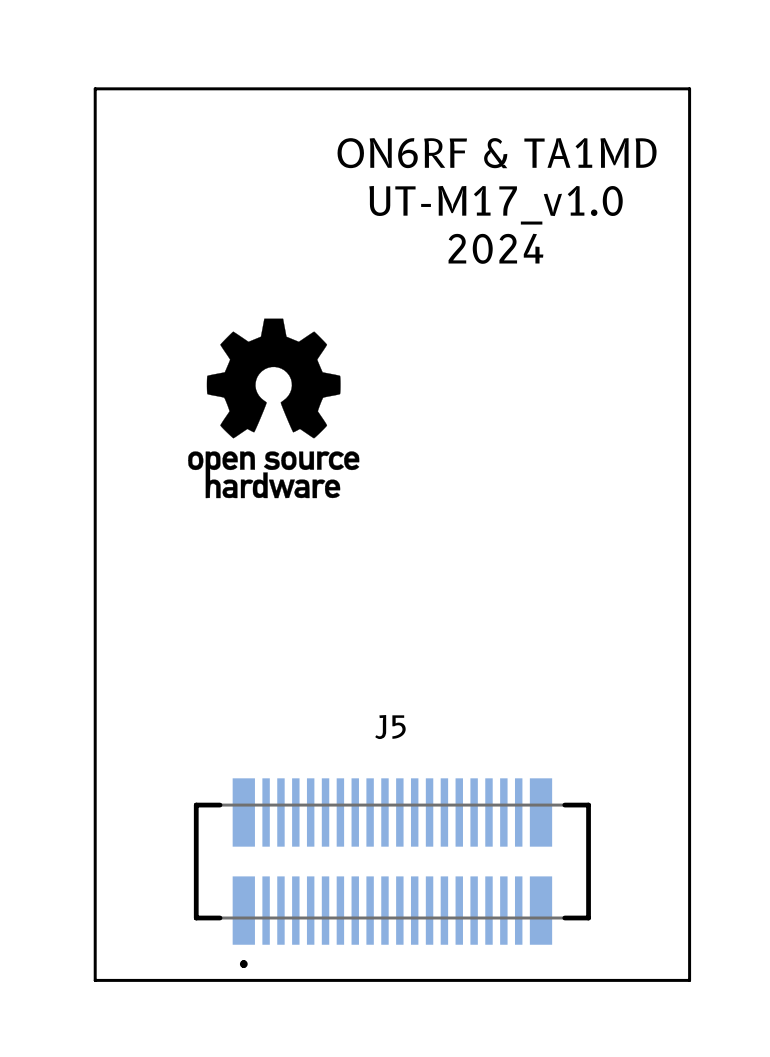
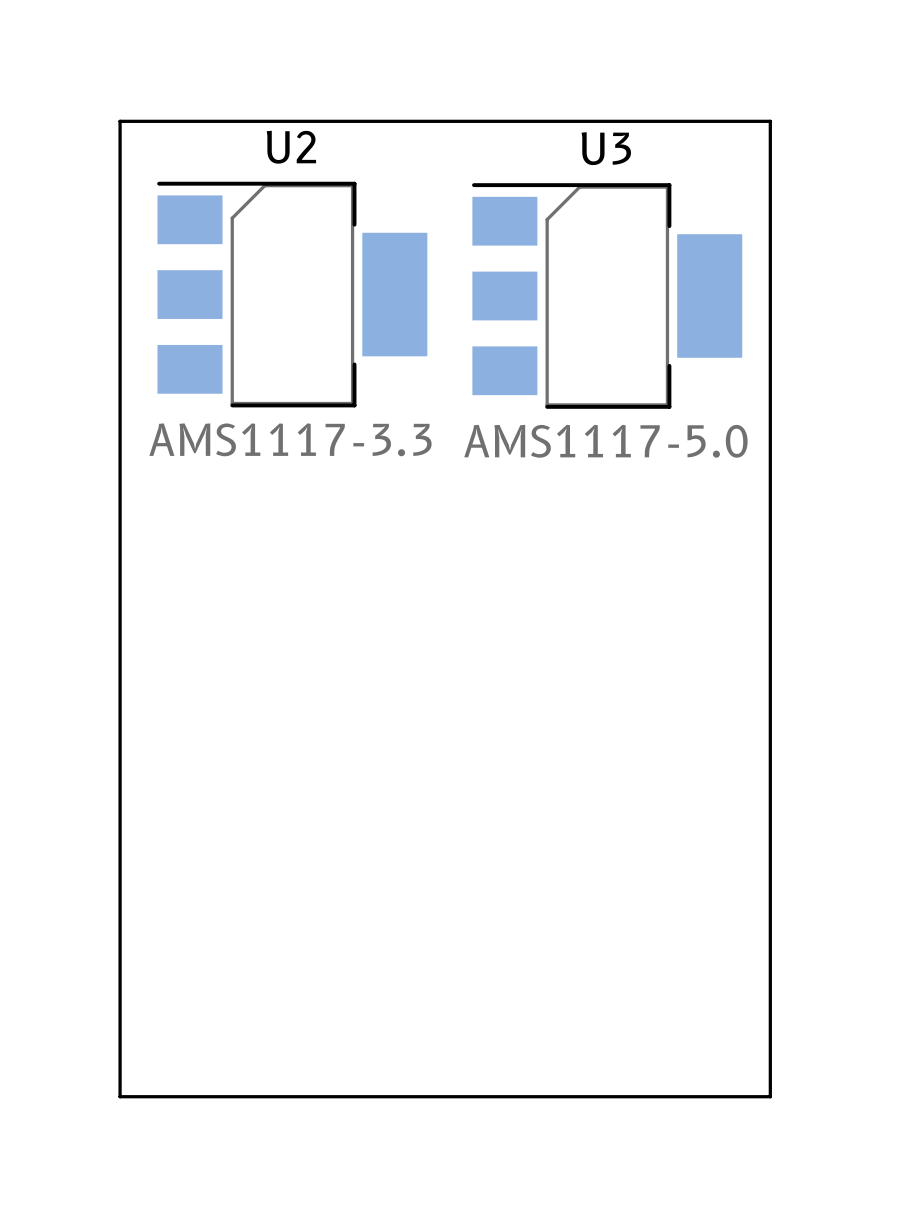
text: ON6RF & TA1MD (497, 153) -> none
text: UT-M17_v1.0 (496, 205) -> none
U2: none -> AMS1117-3.3 (292, 294)
text: 2024 (495, 248) -> none
U3: none -> AMS1117-5.0 (607, 295)
drawing: [188, 318, 360, 499] -> none
J5: (392, 873) -> none

